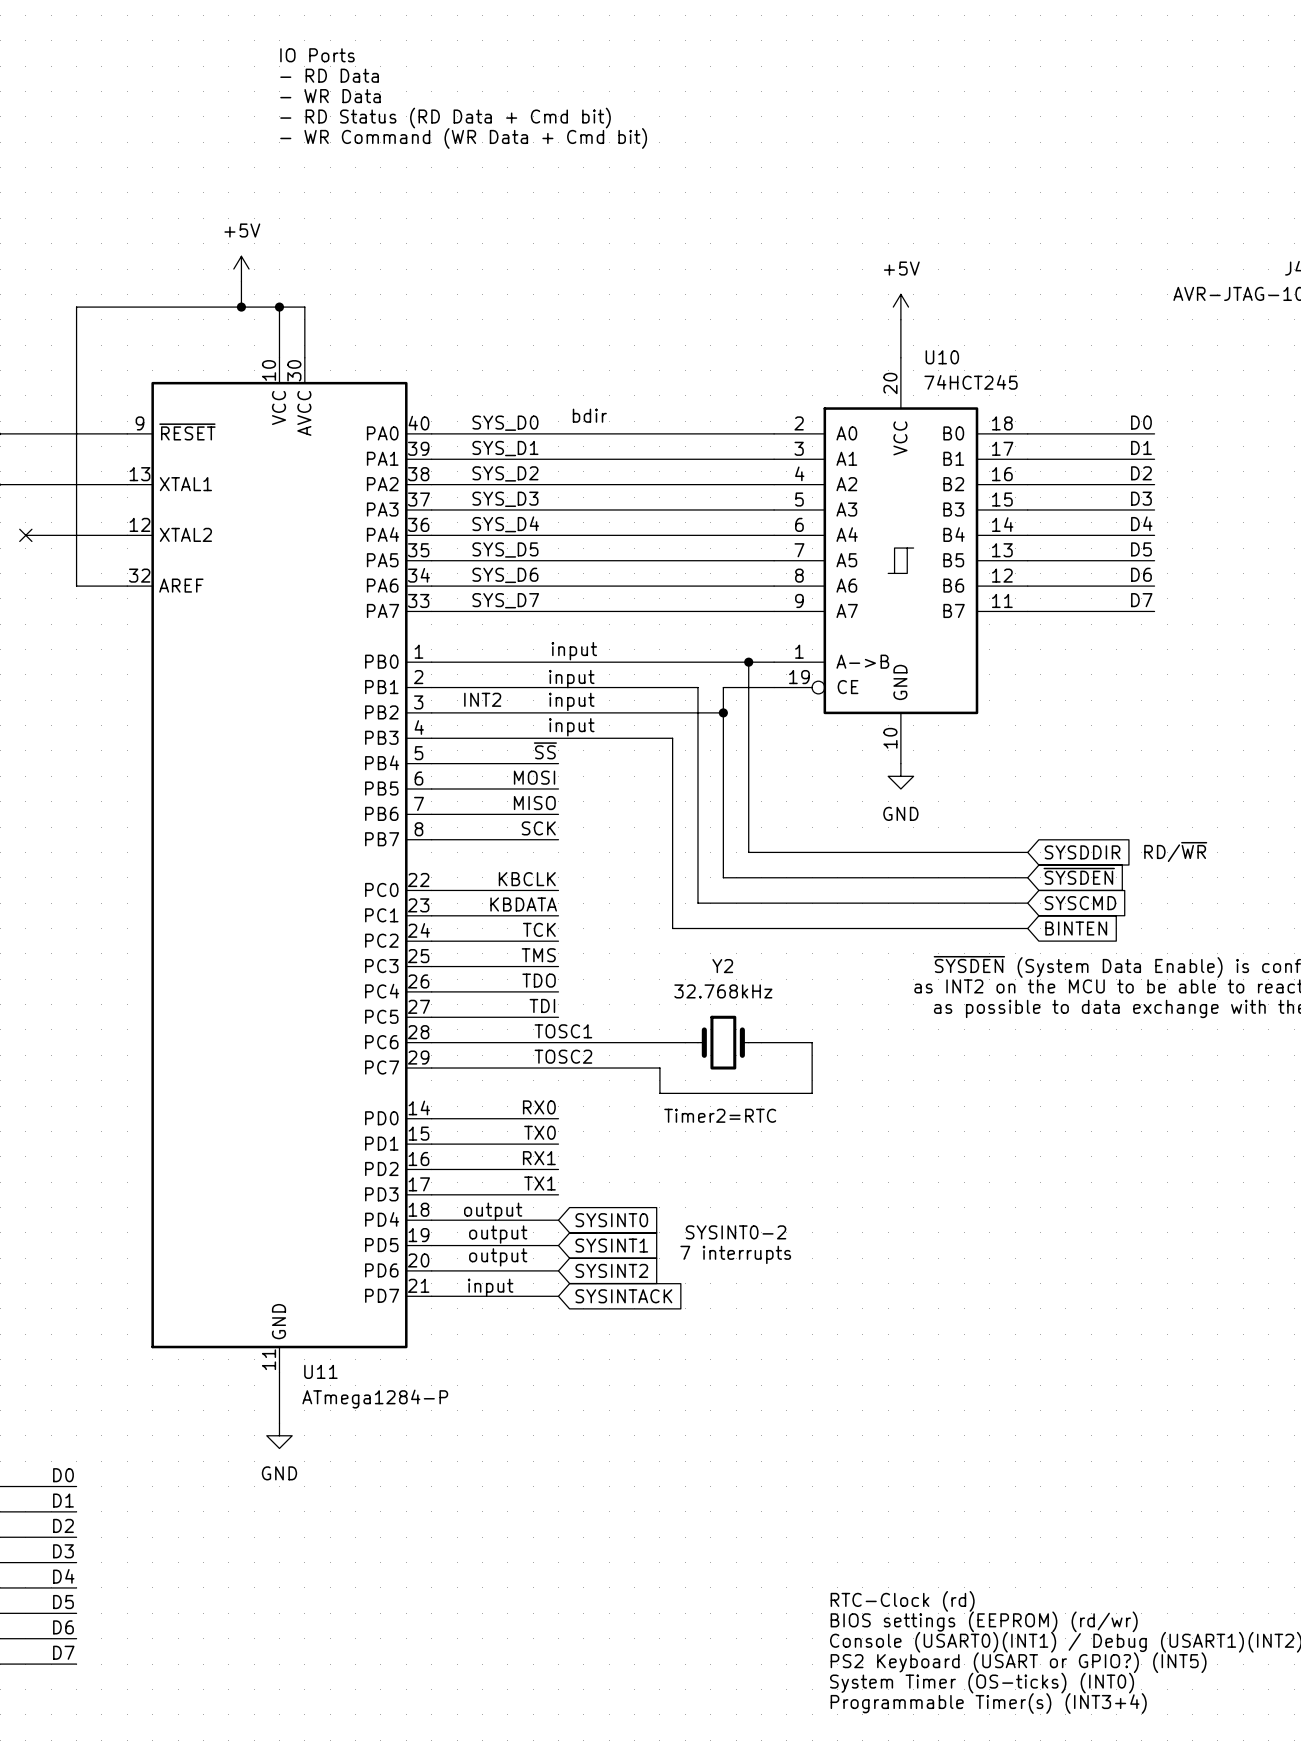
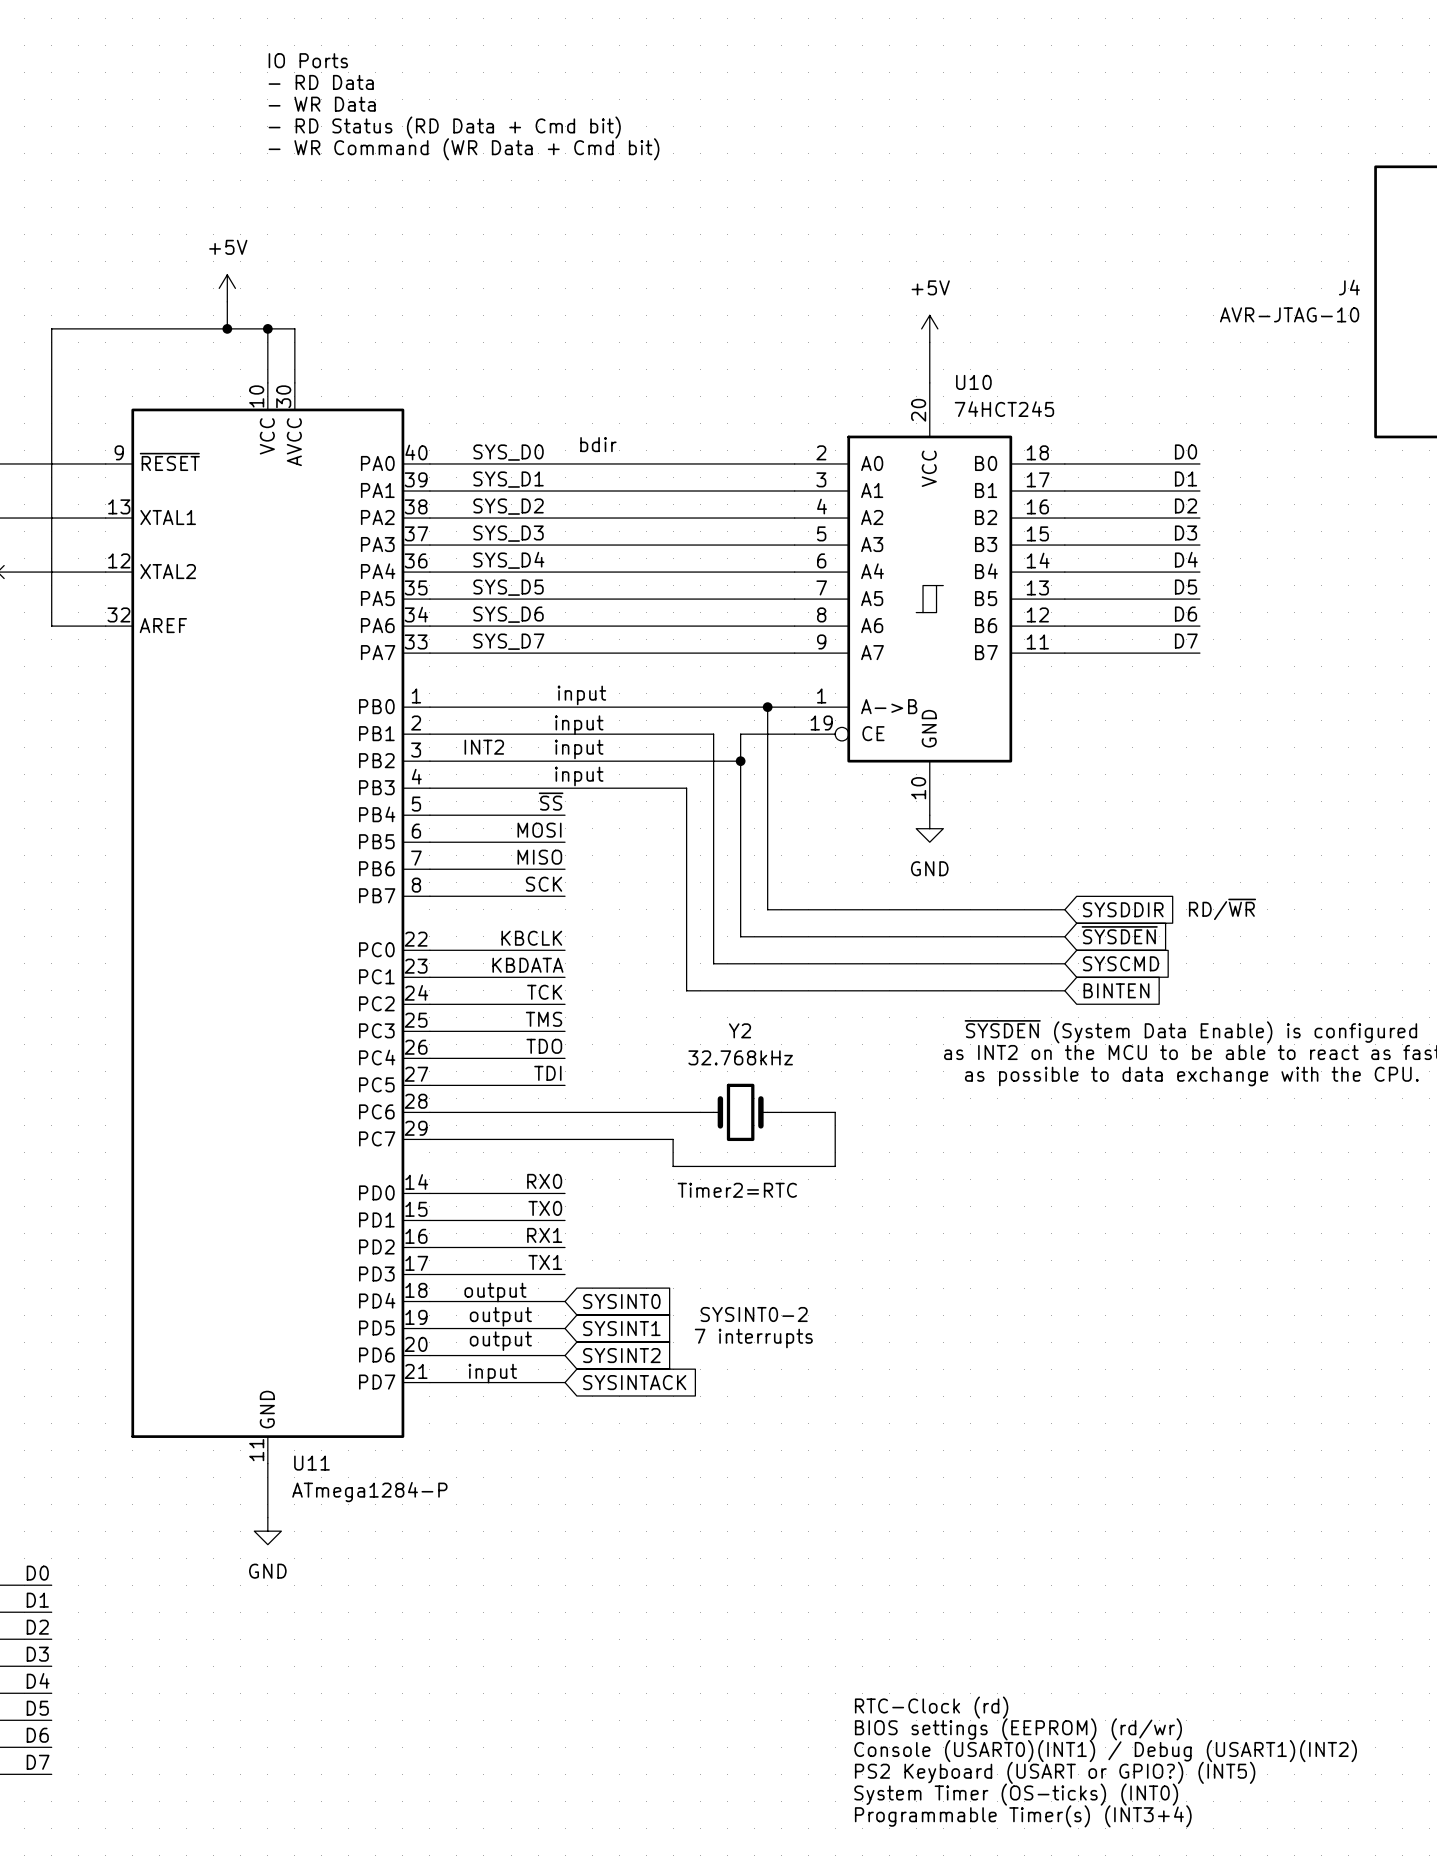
label: TOSC1 (563, 1031) -> none
label: TOSC2 (563, 1056) -> none

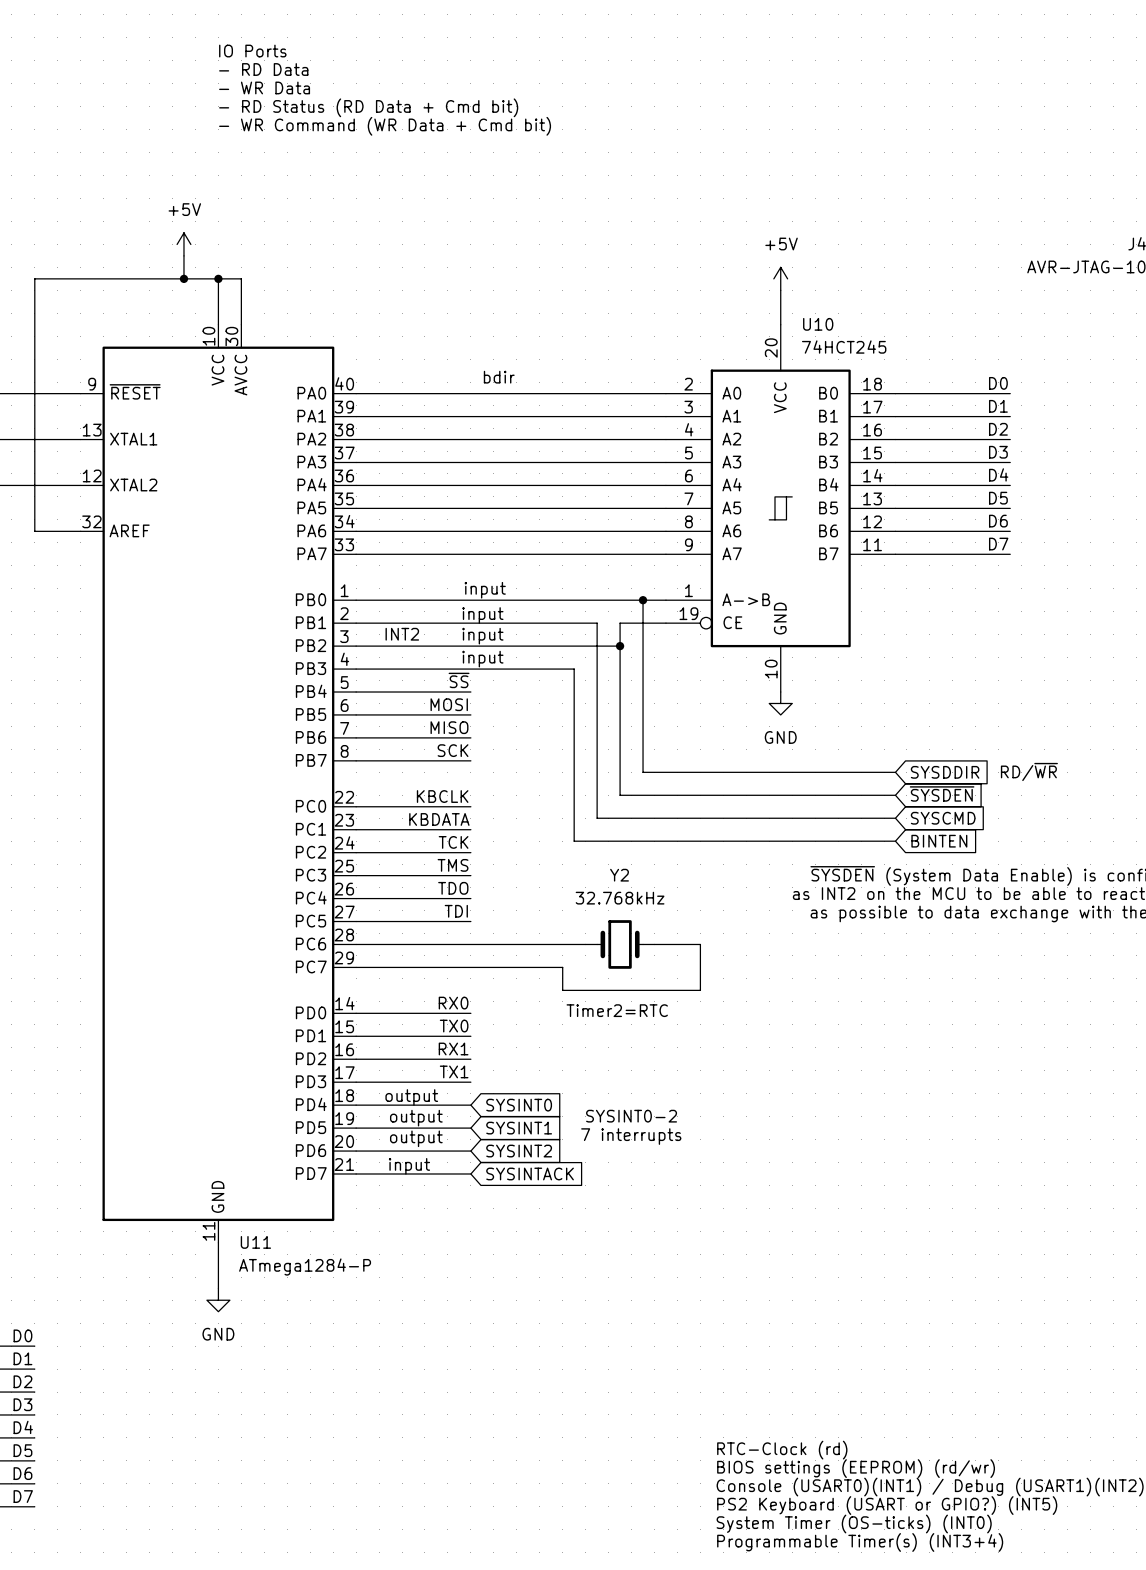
label: SYS_D0 (508, 452) -> none
label: SYS_D1 (508, 479) -> none
label: SYS_D2 (508, 506) -> none
label: SYS_D3 (508, 533) -> none
label: SYS_D4 (508, 560) -> none
label: SYS_D5 (508, 587) -> none
label: SYS_D6 (508, 614) -> none
label: SYS_D7 (508, 641) -> none

